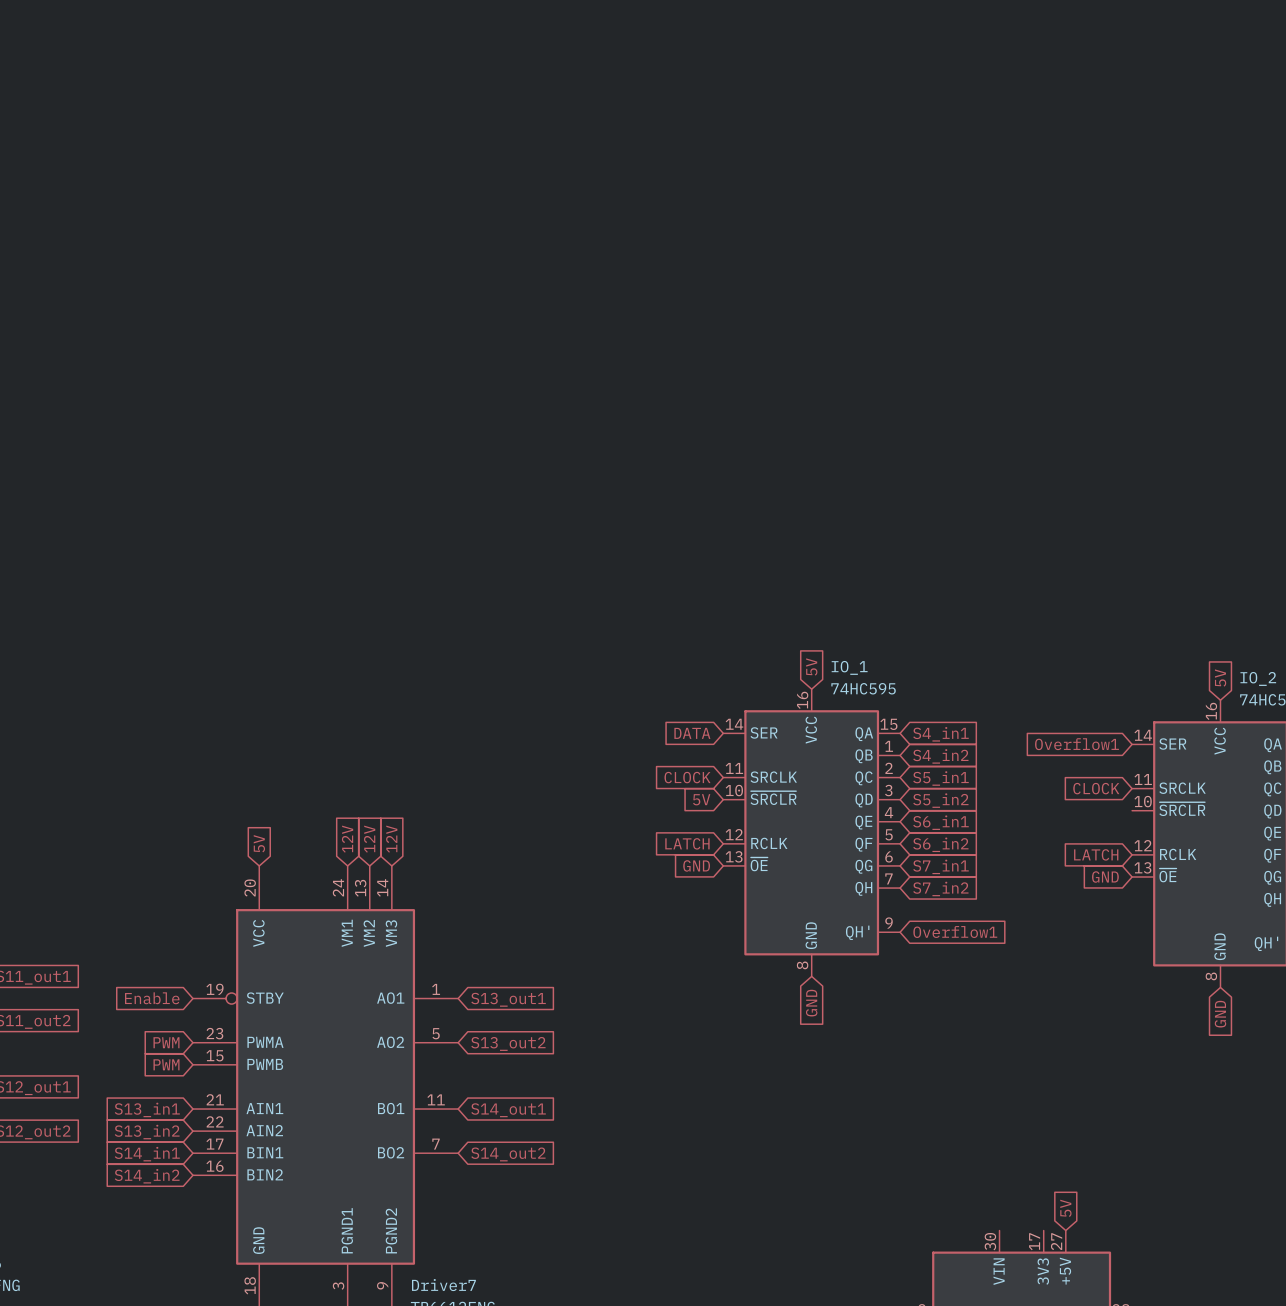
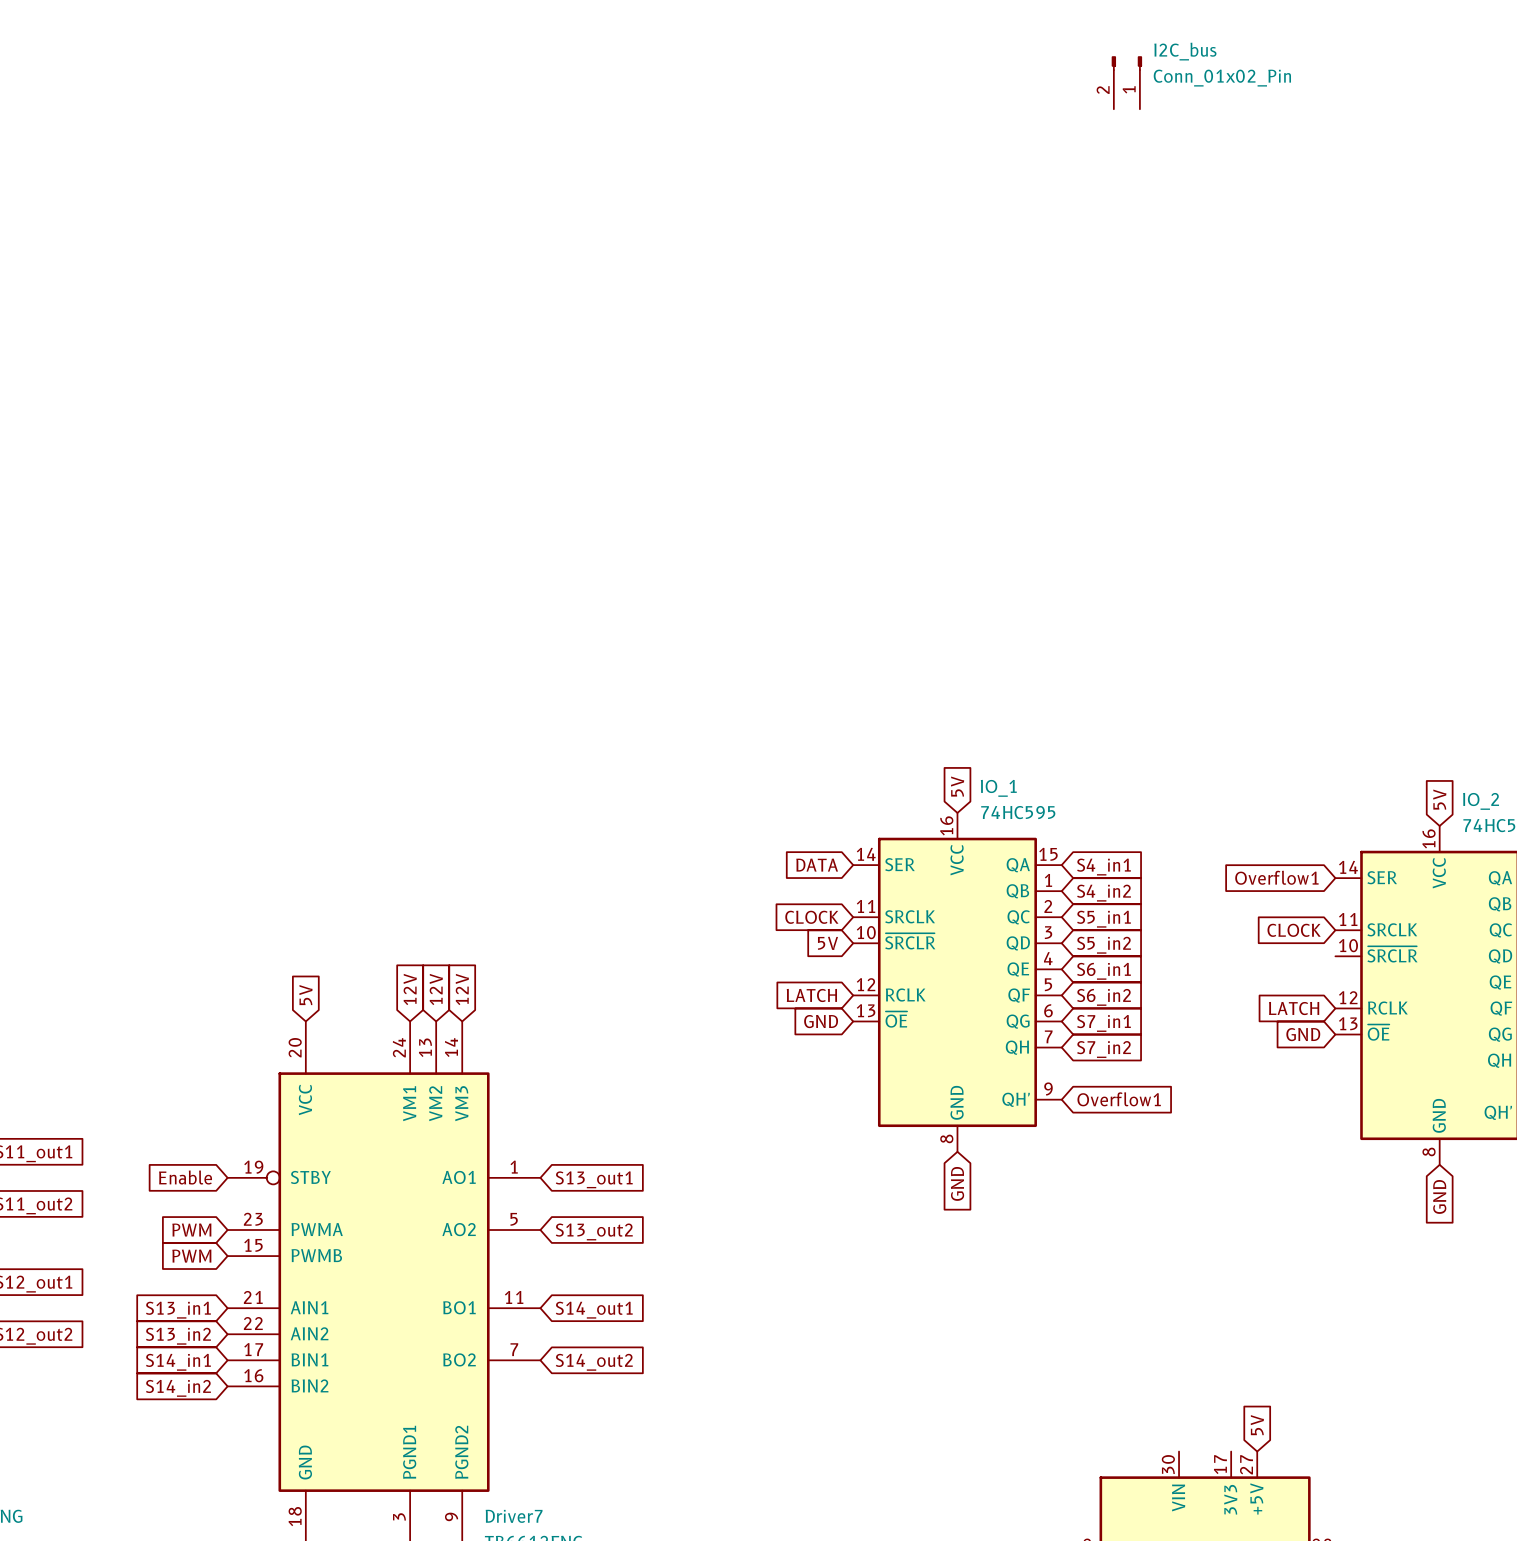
I2C_bus: none -> Conn_01x02_Pin (1126, 82)

